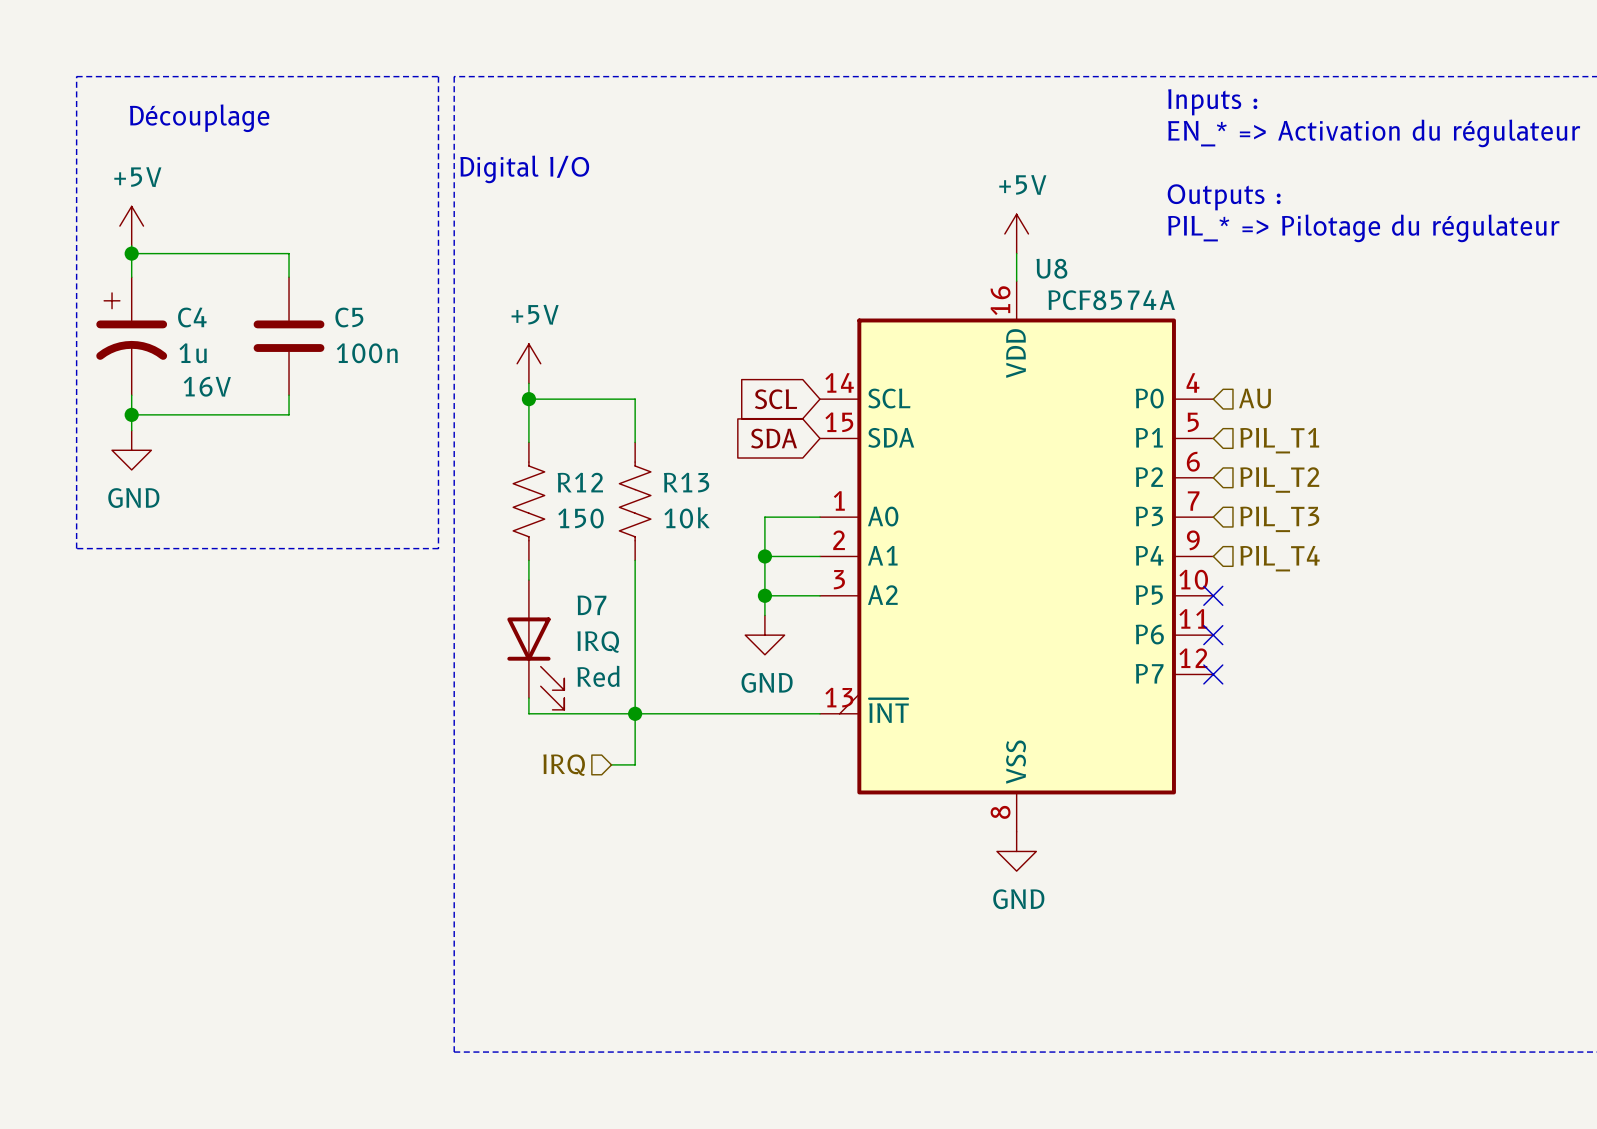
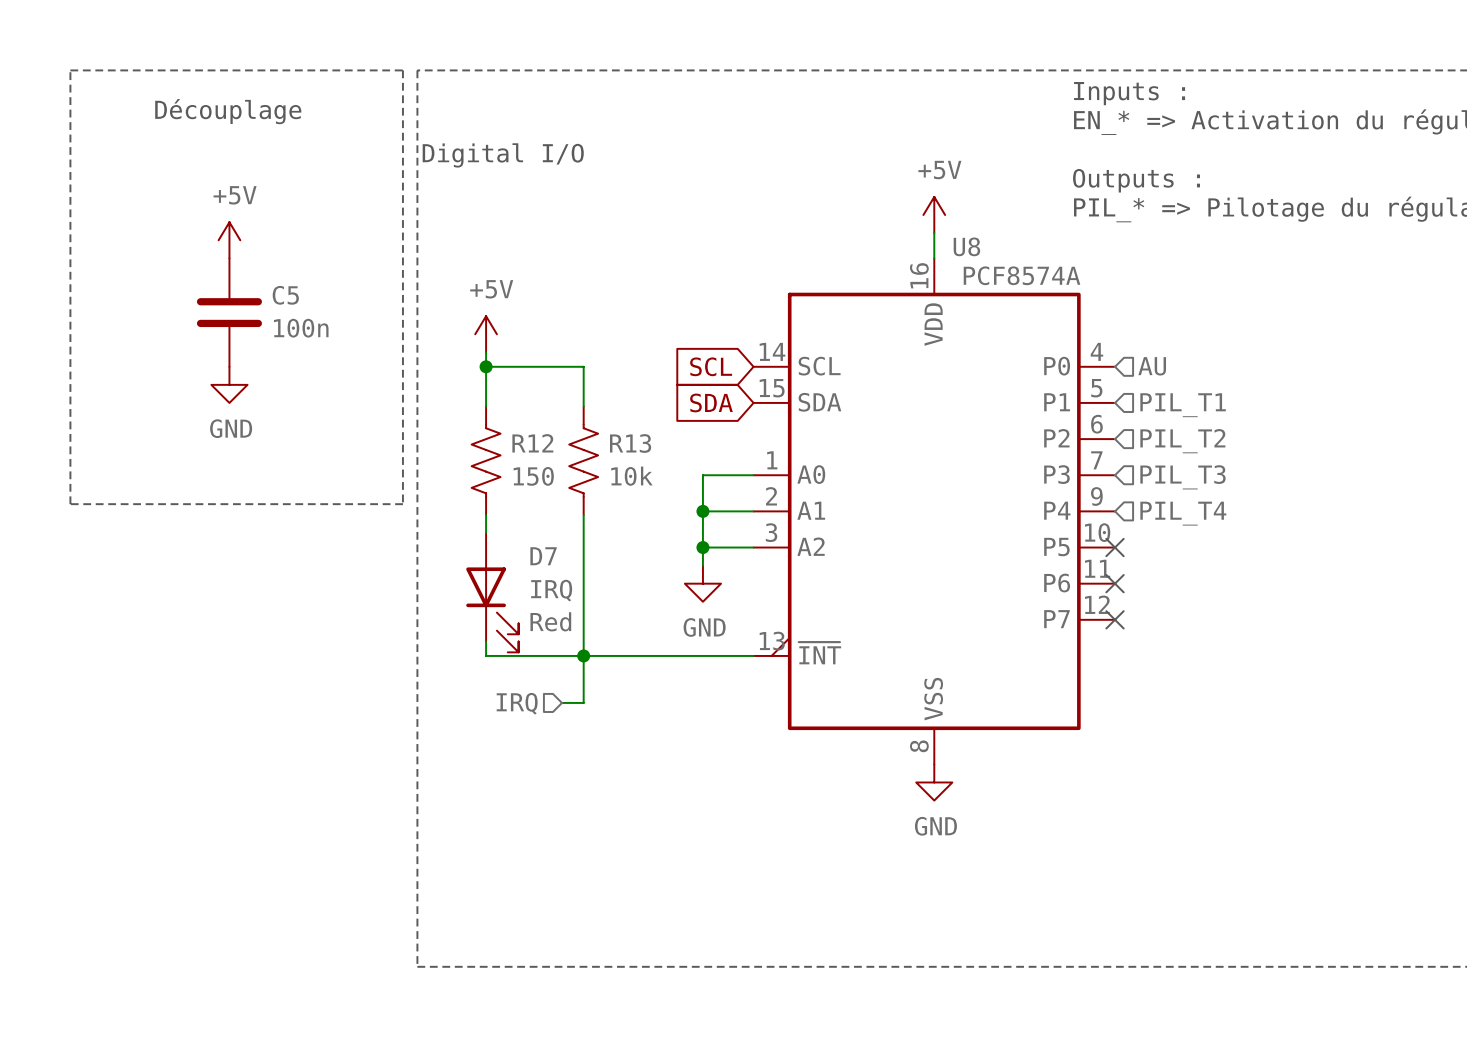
text position: Découplage (199, 118) -> Découplage (228, 111)
power symbol position: +5V (131, 226) -> +5V (229, 240)
wire: (131, 245) (131, 277) -> none
wire: (131, 253) (289, 253) (289, 277) -> none
junction: (131, 253) -> none
C4: 1u (131, 336) -> none
C5 position: (289, 336) -> (229, 312)
wire: (131, 395) (131, 430) -> none
wire: (289, 395) (289, 414) (131, 414) -> none
junction: (131, 414) -> none
power symbol position: GND (131, 450) -> GND (229, 384)

